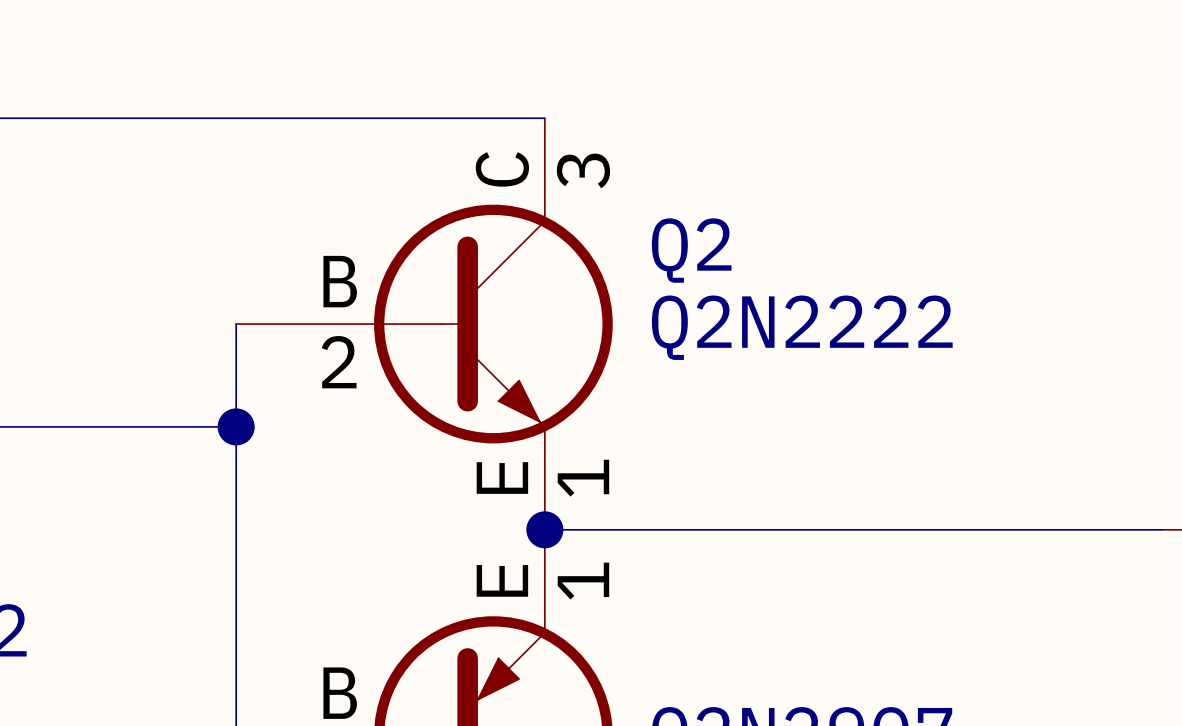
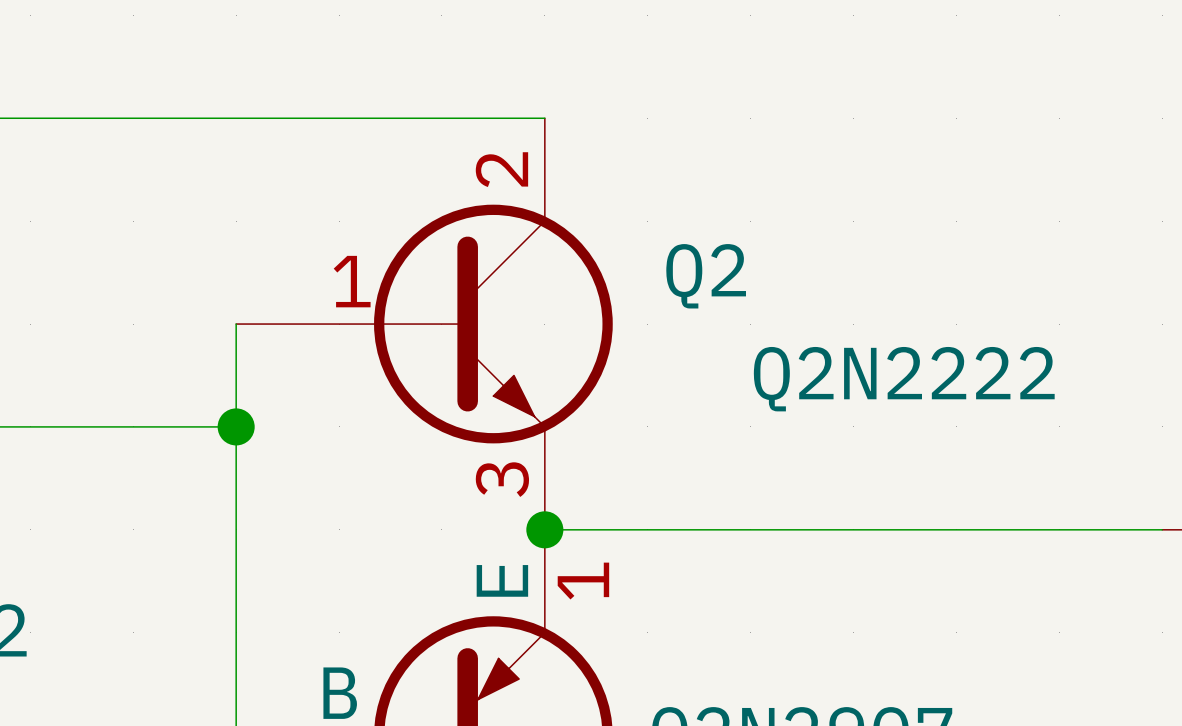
Q2 symbol: [236, 118, 613, 530] -> [236, 118, 613, 530]

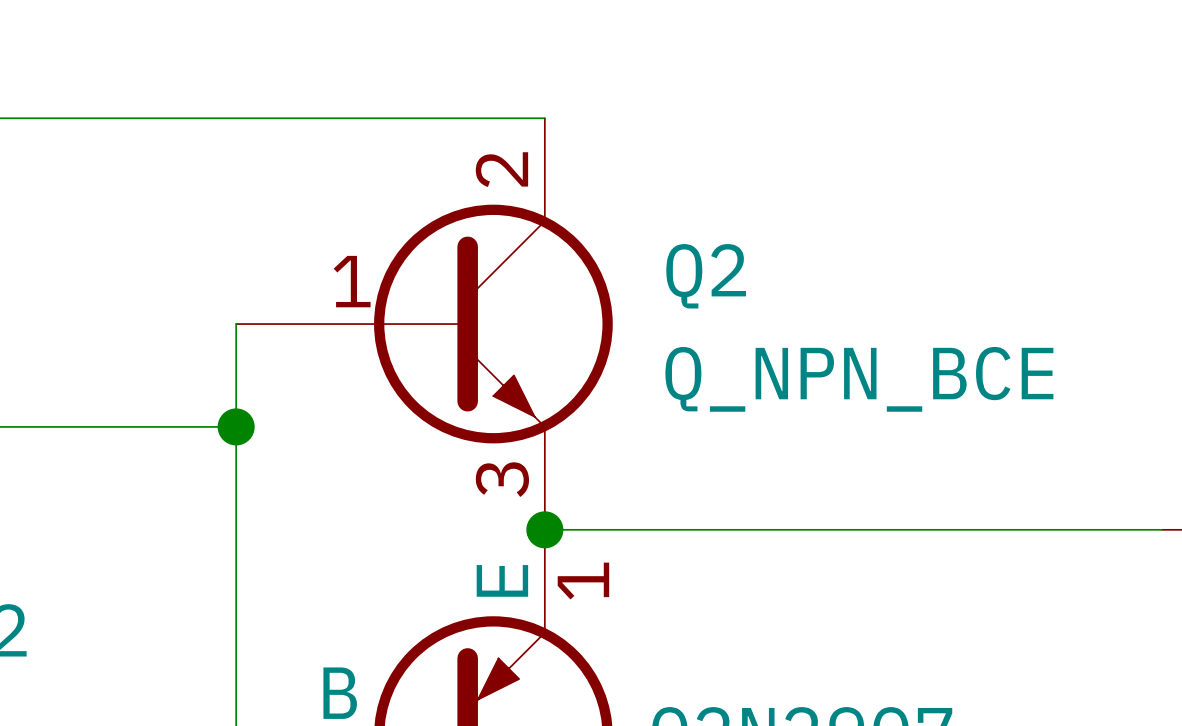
Q2 value: Q2N2222 (904, 379) -> Q_NPN_BCE (859, 379)

